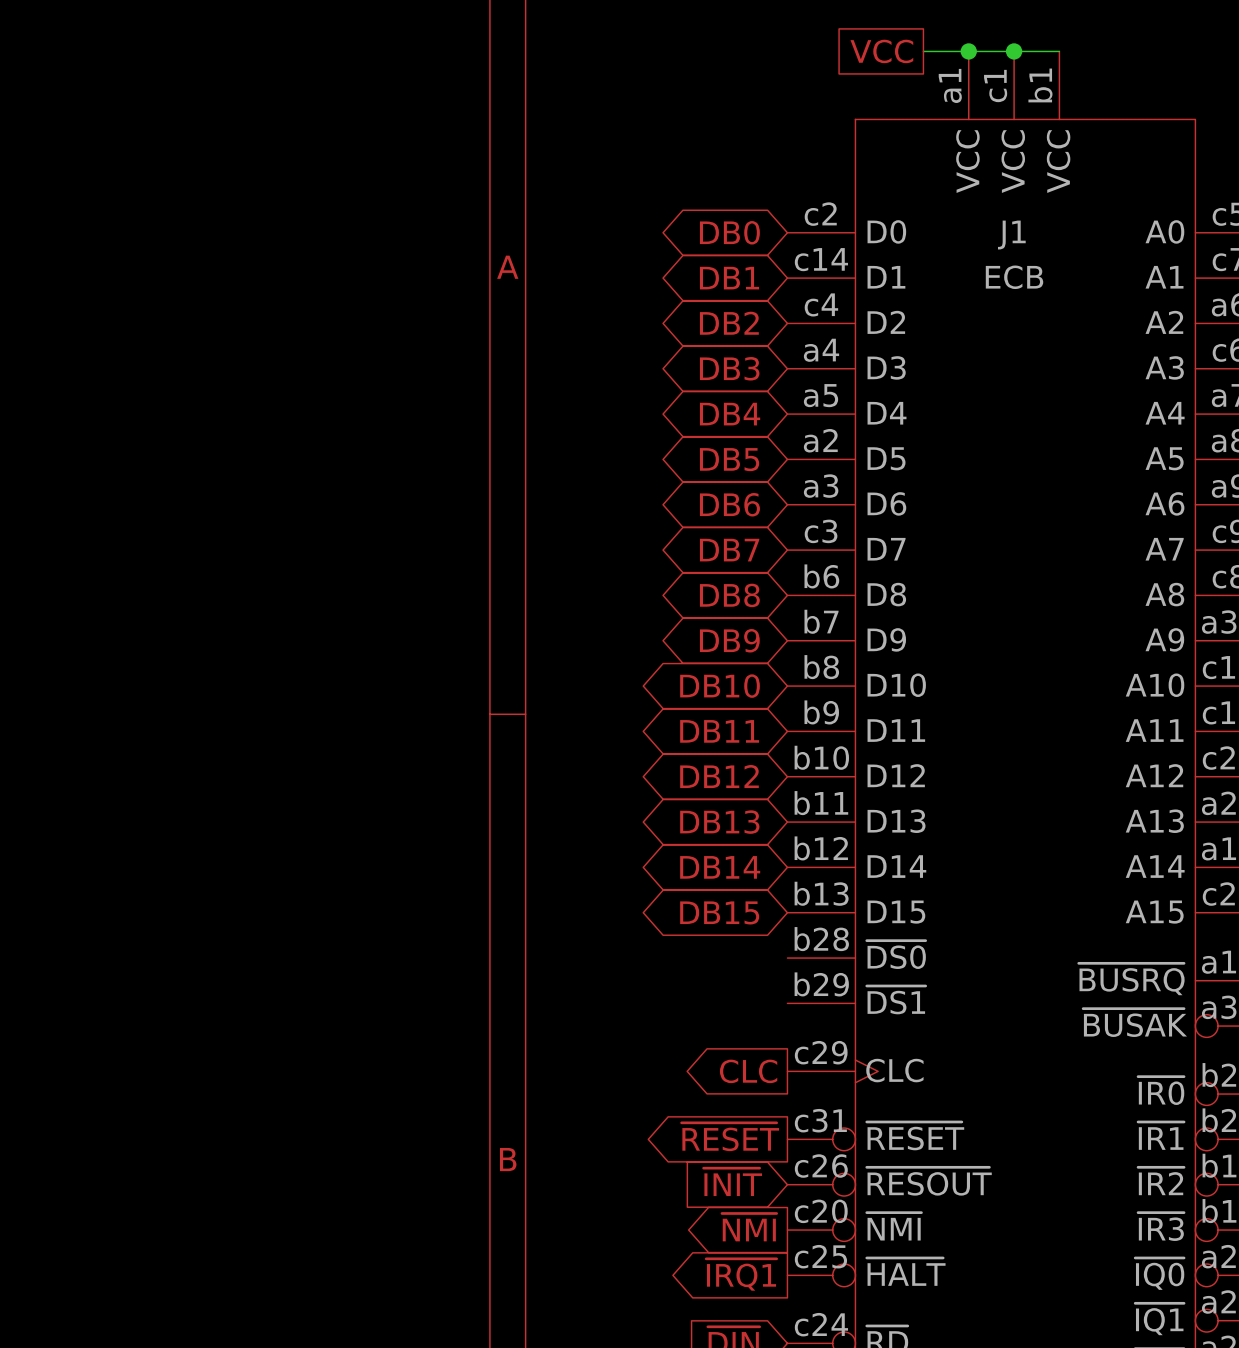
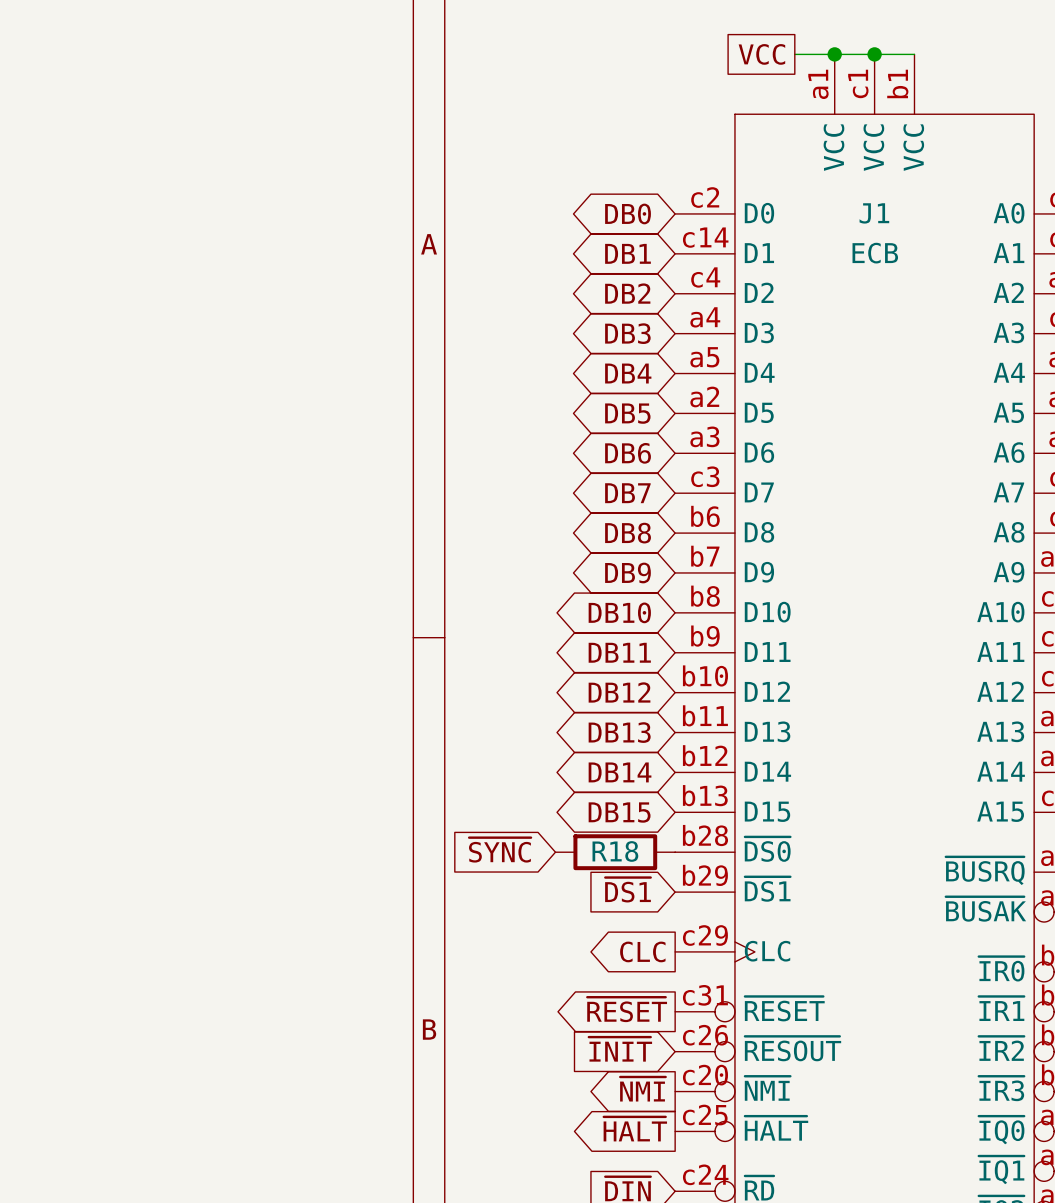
global label: none -> ~{SYNC} (500, 850)
R18: none -> (615, 852)
global label: none -> ~{DS1} (627, 890)
global label: ~{IRQ1} (741, 1274) -> ~{HALT} (635, 1129)

